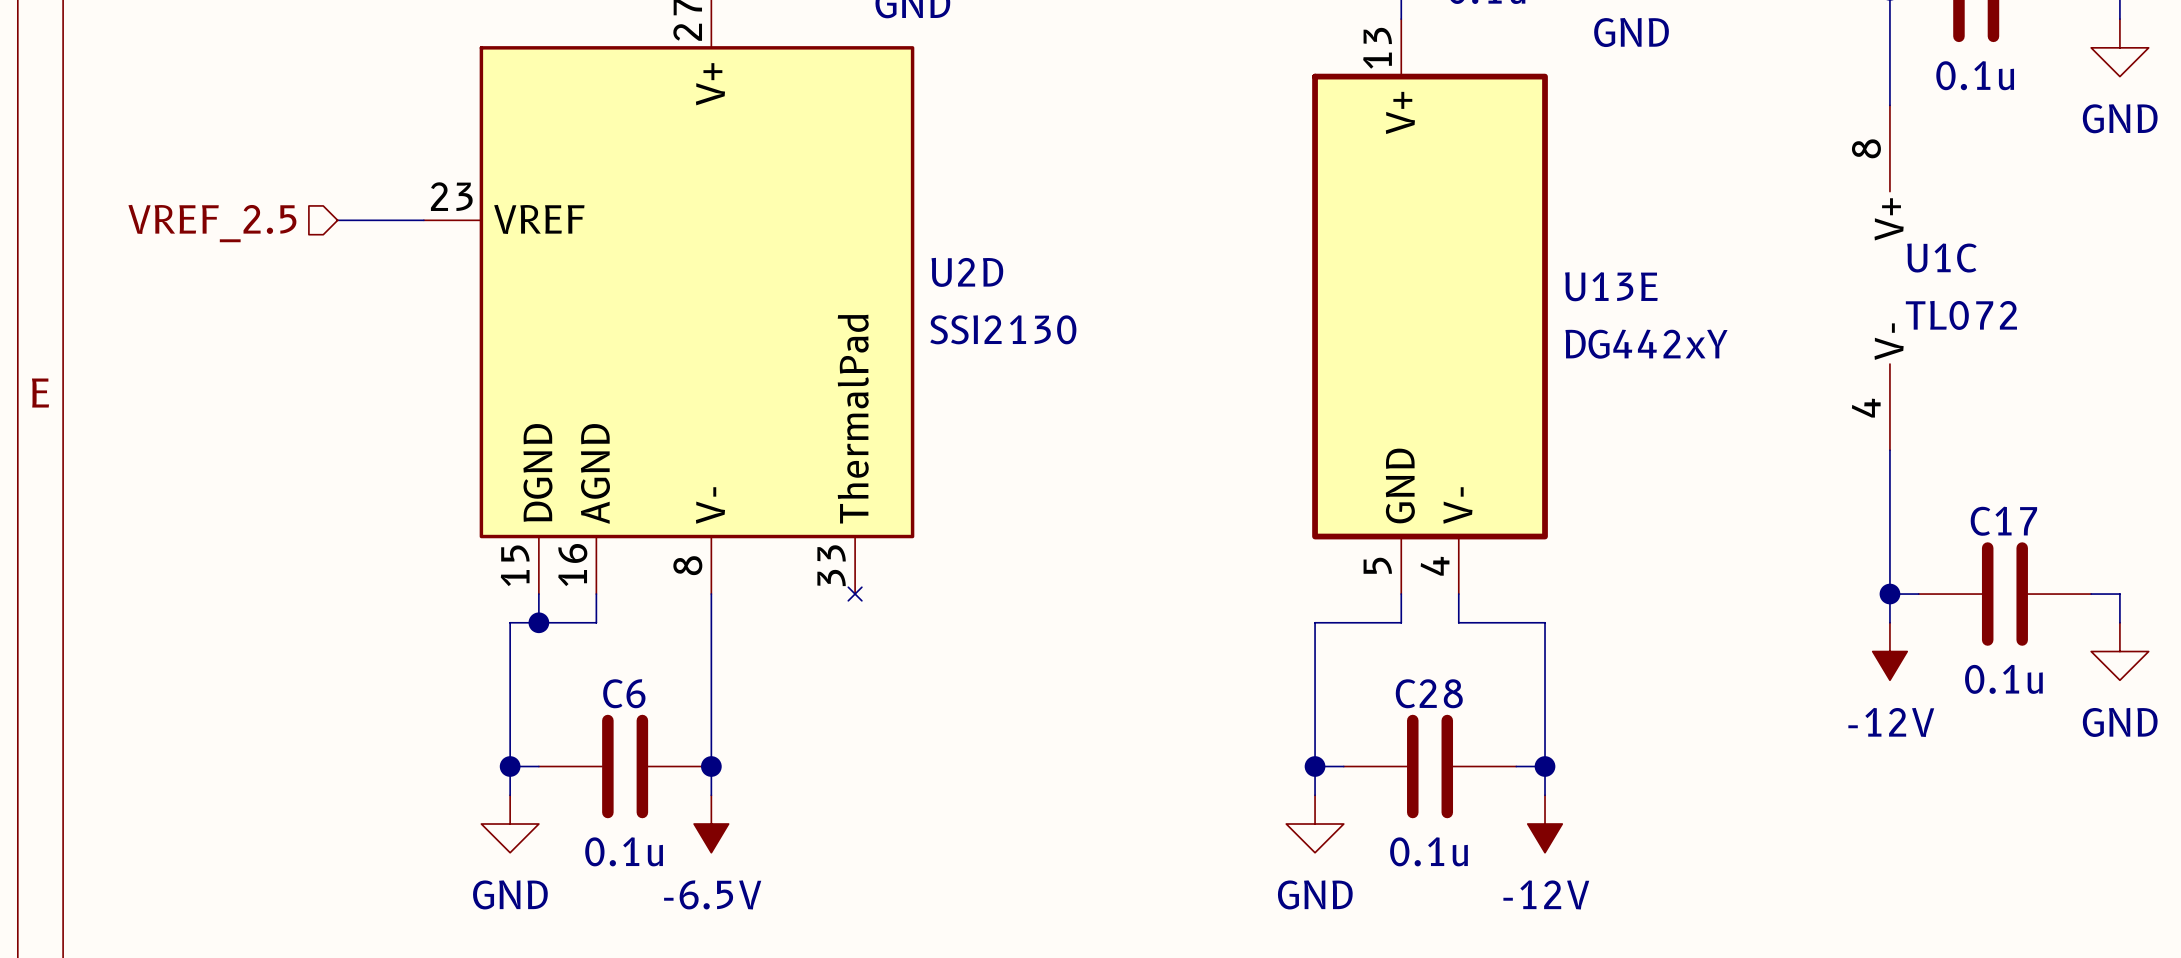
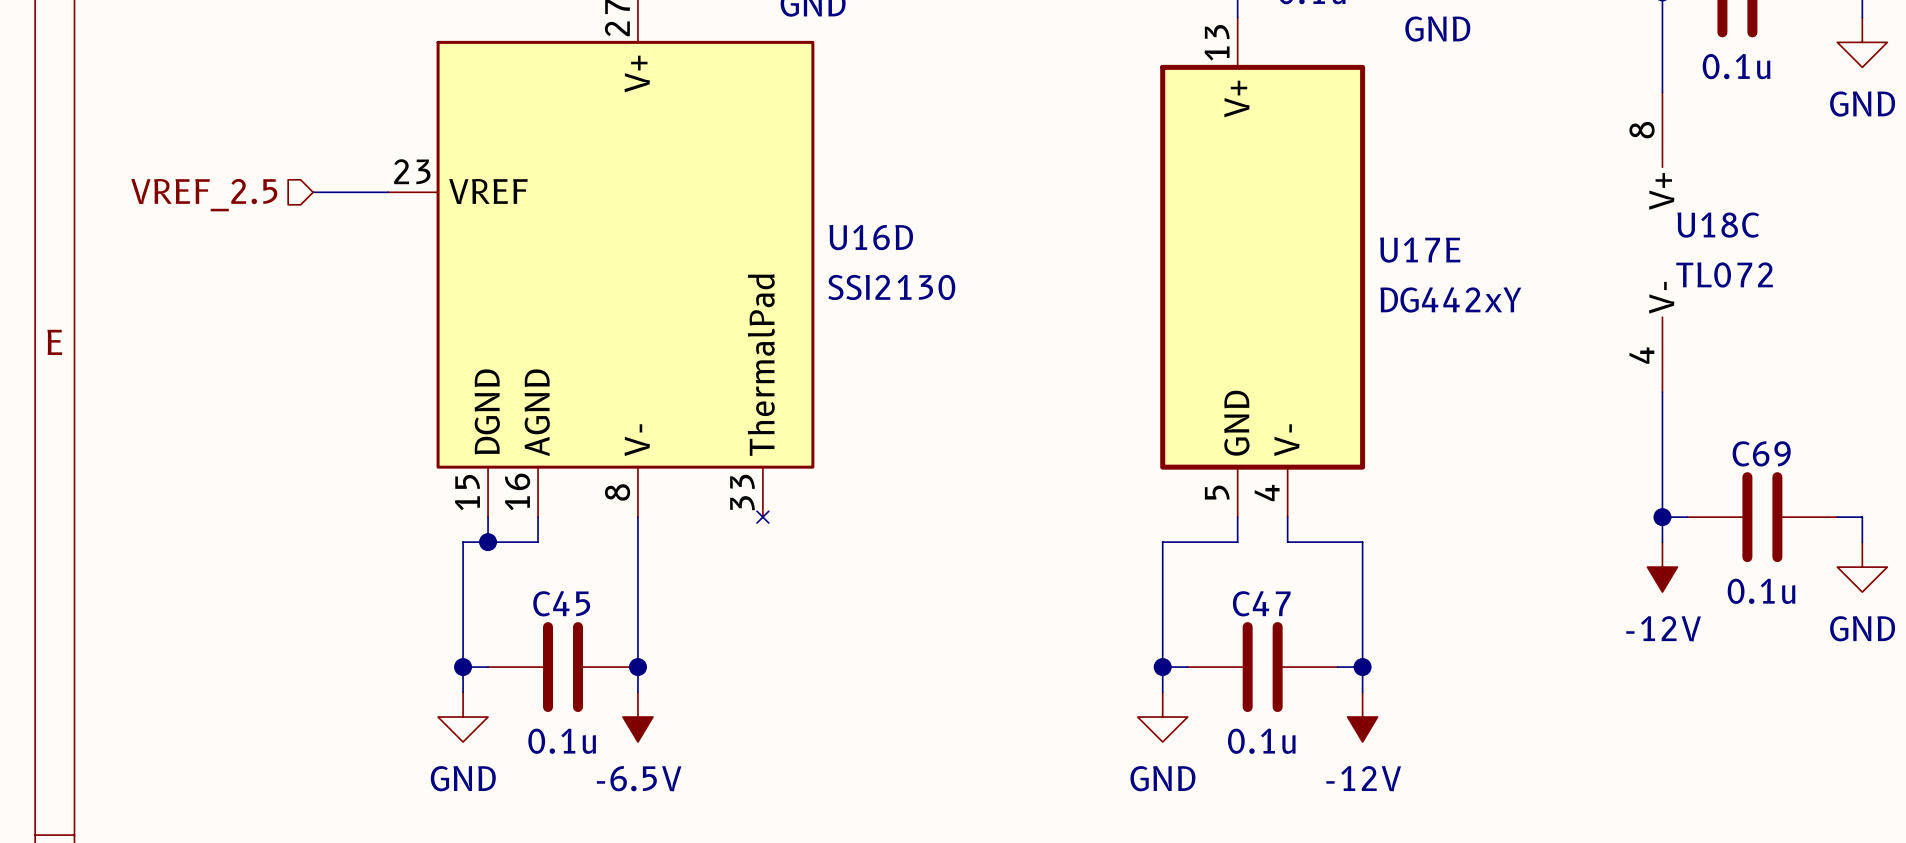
U1C name: U1C (1941, 258) -> U18C (1718, 225)
U2D name: U2D (967, 272) -> U16D (871, 237)
U13E name: U13E (1611, 286) -> U17E (1420, 250)
C17 name: C17 (2003, 521) -> C69 (1761, 453)
C6 name: C6 (624, 693) -> C45 (561, 603)
C28 name: C28 (1429, 693) -> C47 (1261, 603)

